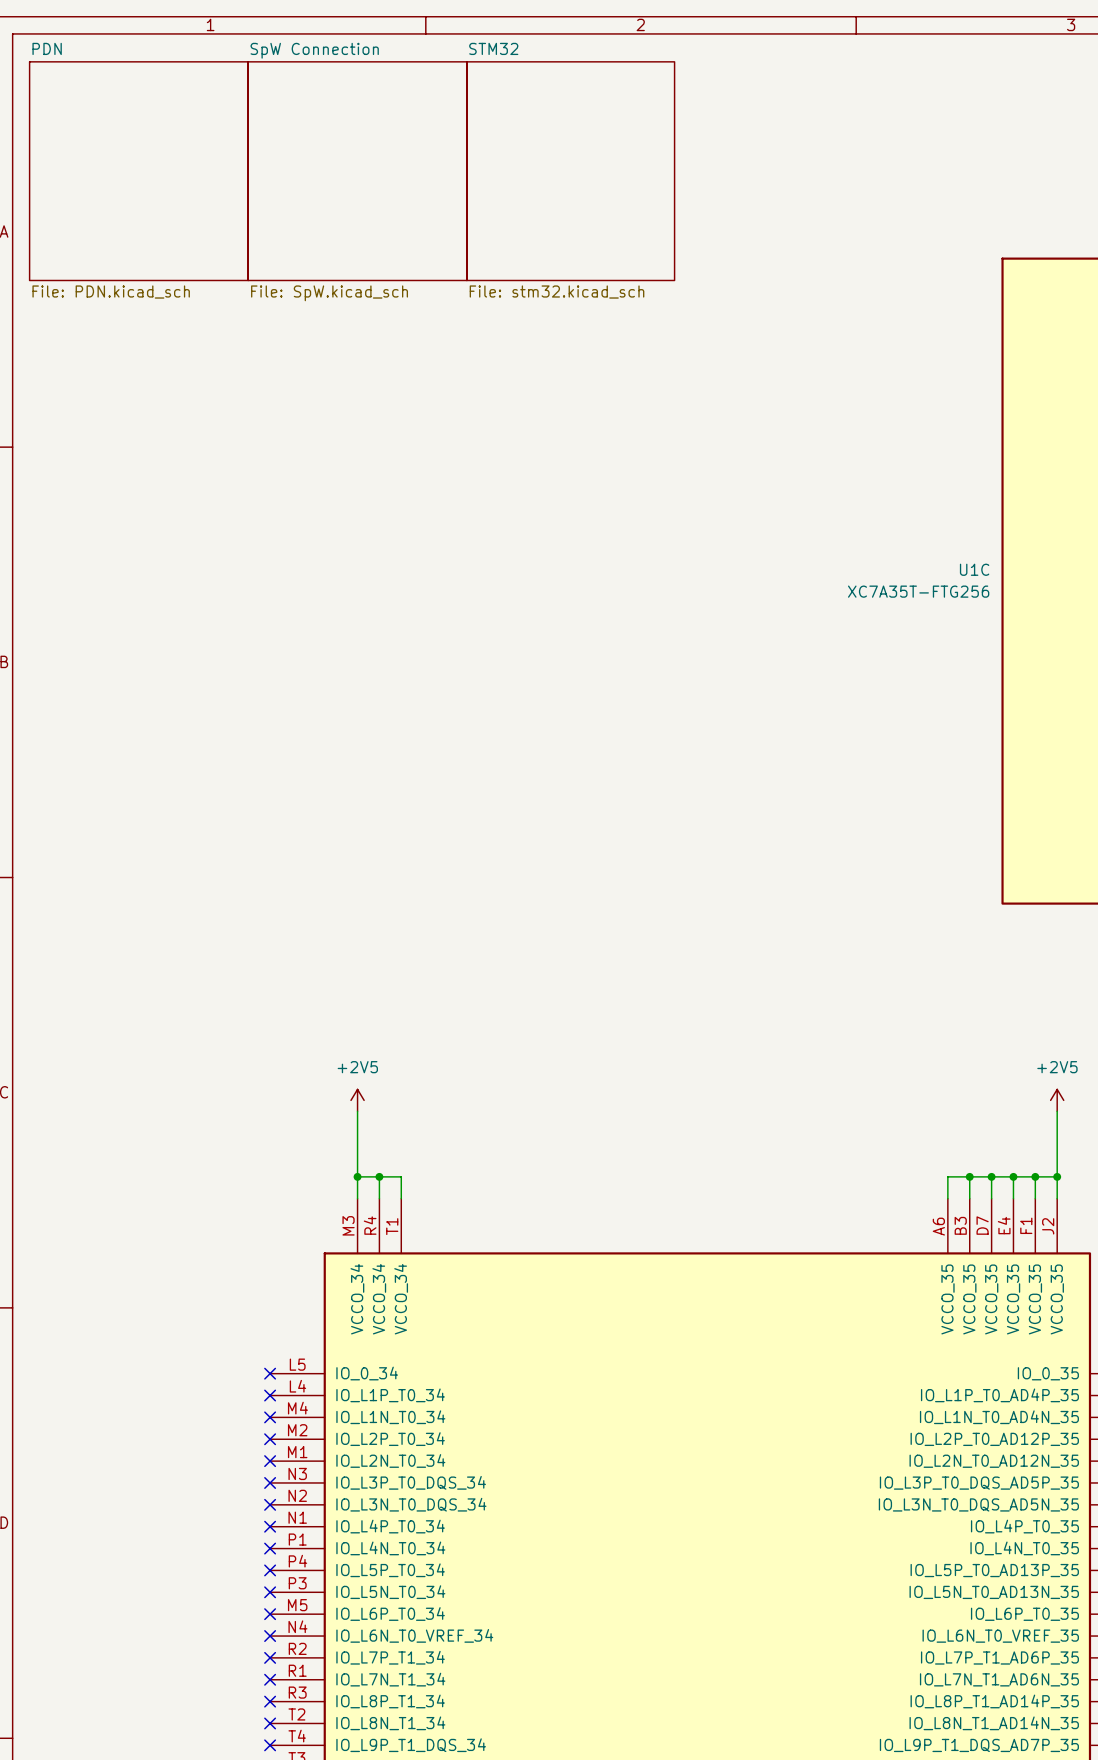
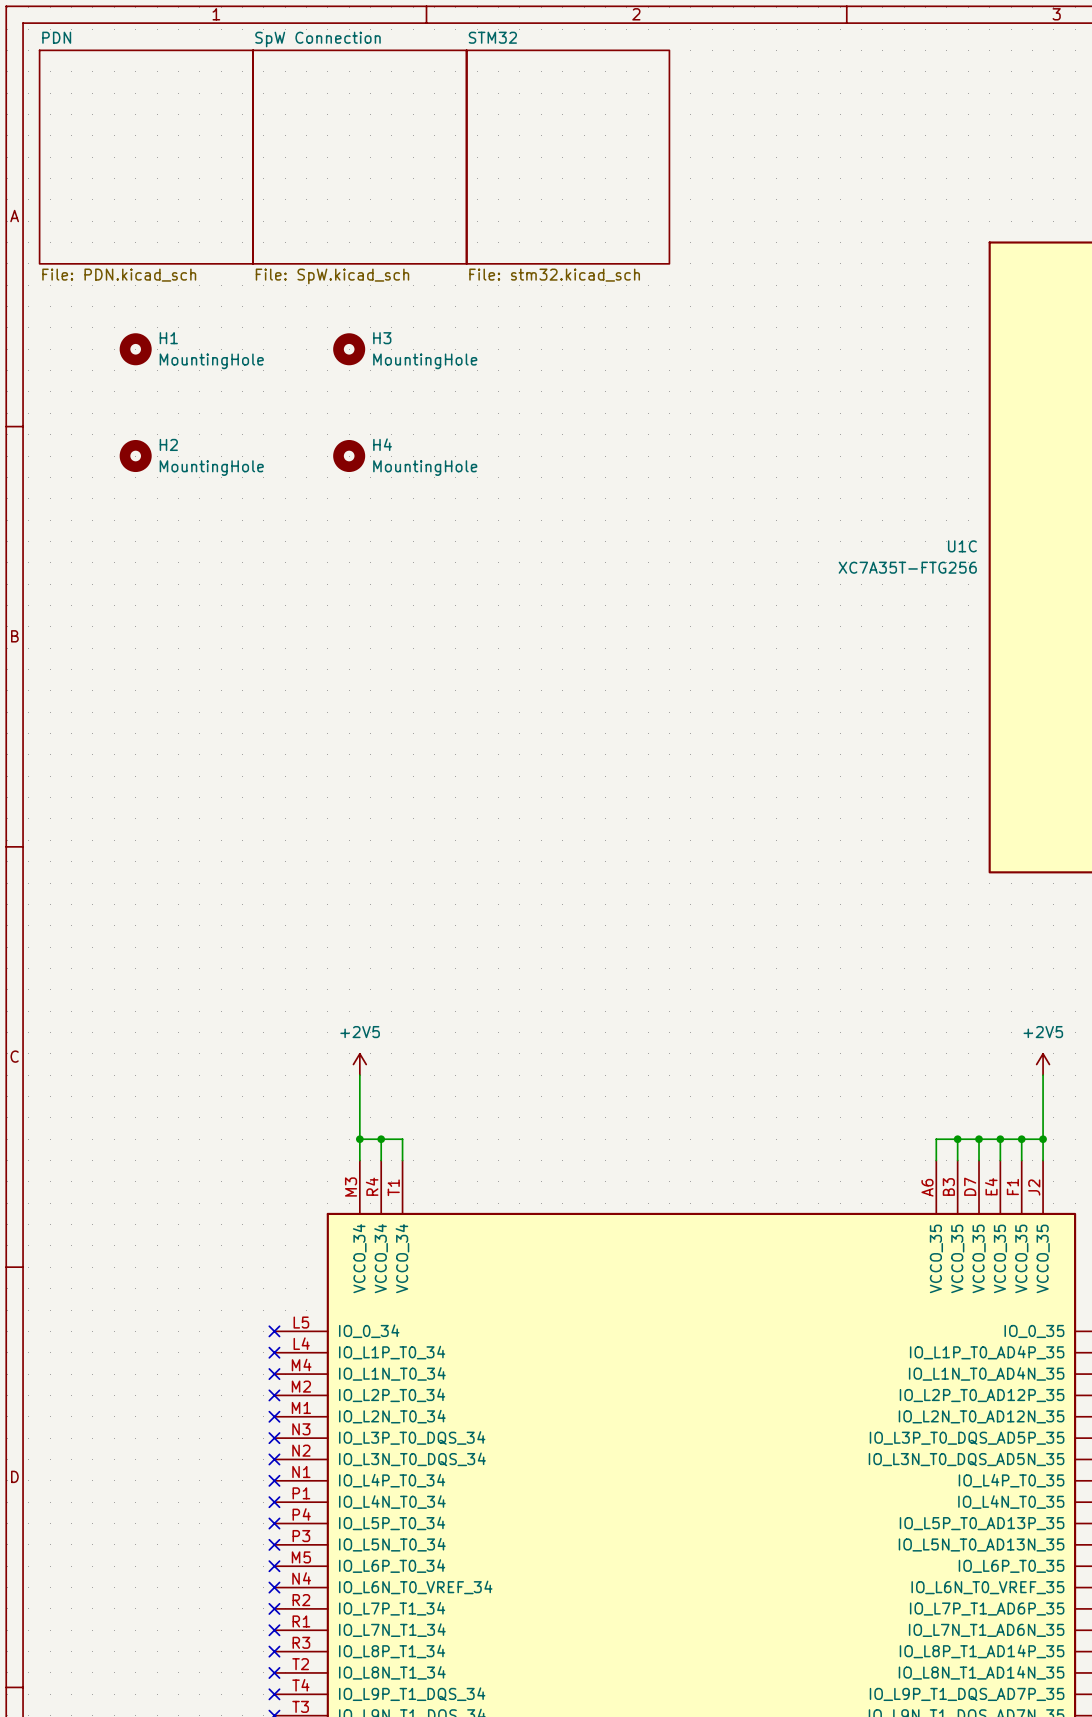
H1: none -> MountingHole (135, 349)
H3: none -> MountingHole (349, 349)
H2: none -> MountingHole (135, 456)
H4: none -> MountingHole (349, 456)

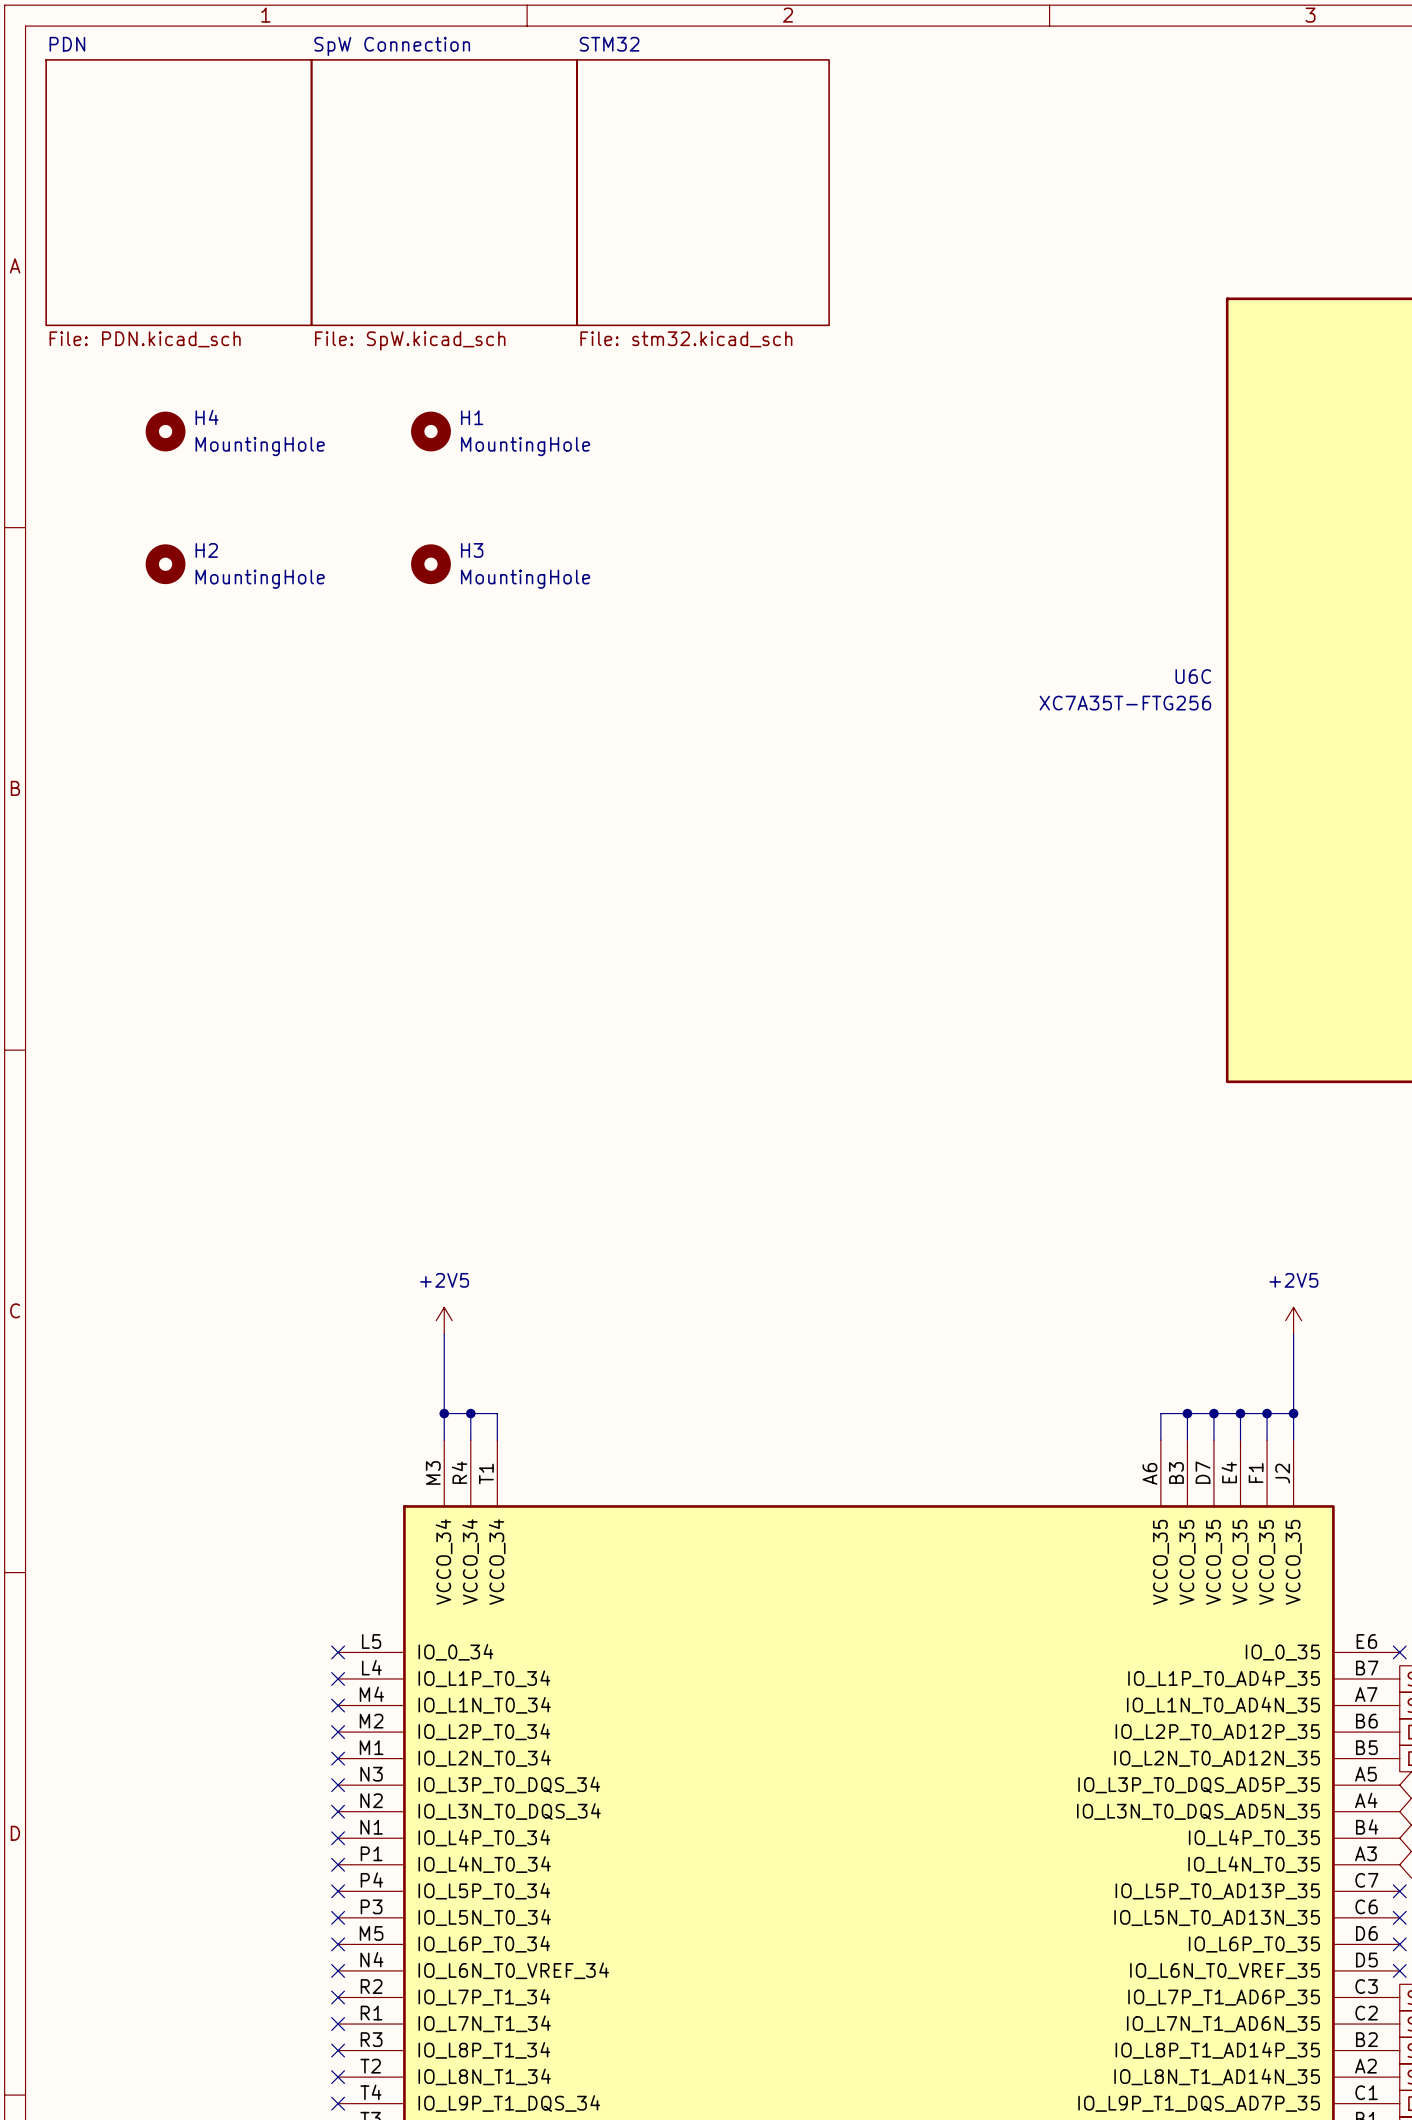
H1 name: H1 (168, 338) -> H4 (207, 417)
H3 name: H3 (382, 338) -> H1 (472, 417)
H4 name: H4 (382, 444) -> H3 (472, 550)
U1C name: U1C (962, 546) -> U6C (1193, 676)

